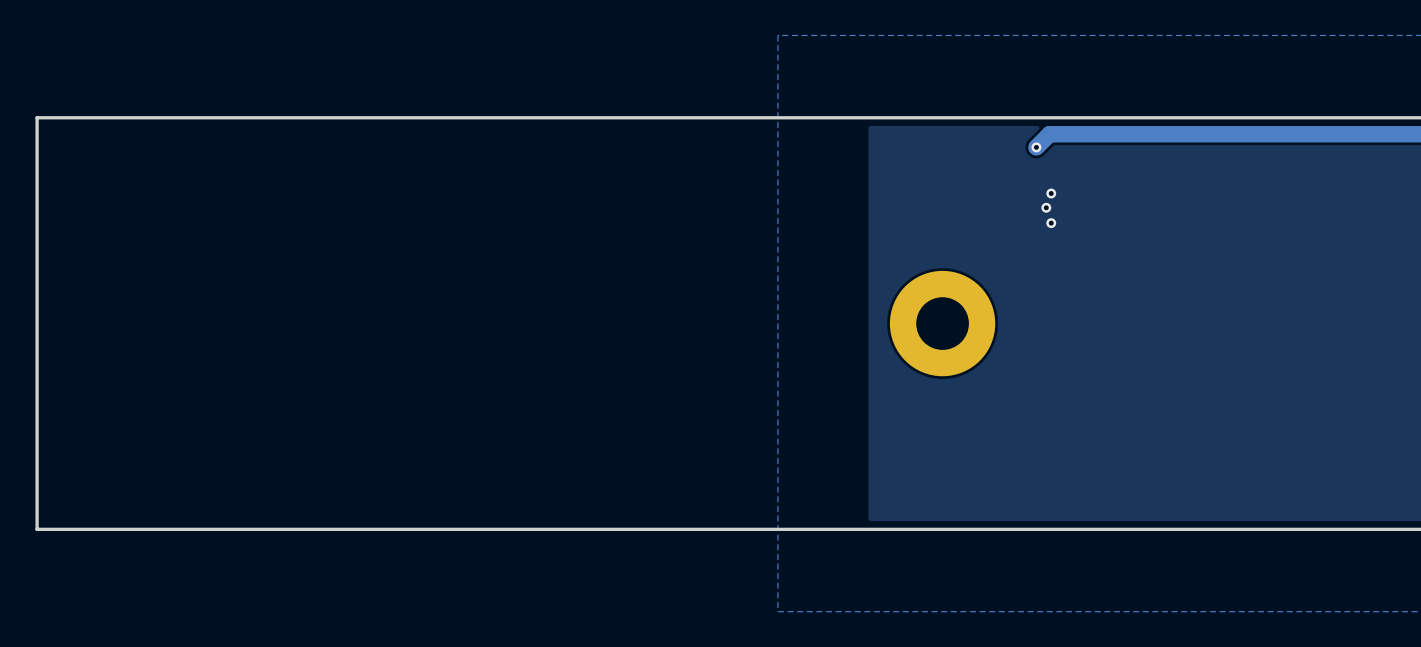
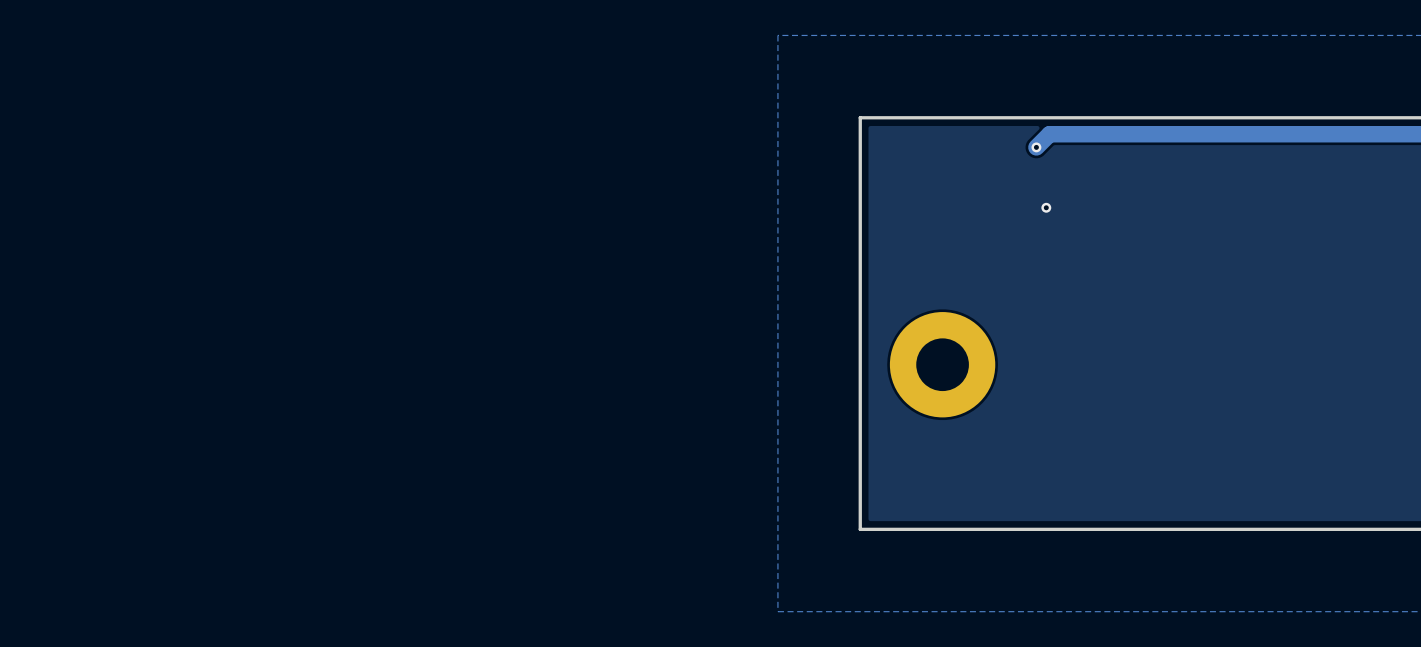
board edge: (860, 117) (37, 117) (37, 529) (860, 529) -> (860, 117) (860, 529)
via: (1051, 193) -> none
via: (1051, 223) -> none
part position: (942, 323) -> (942, 364)

